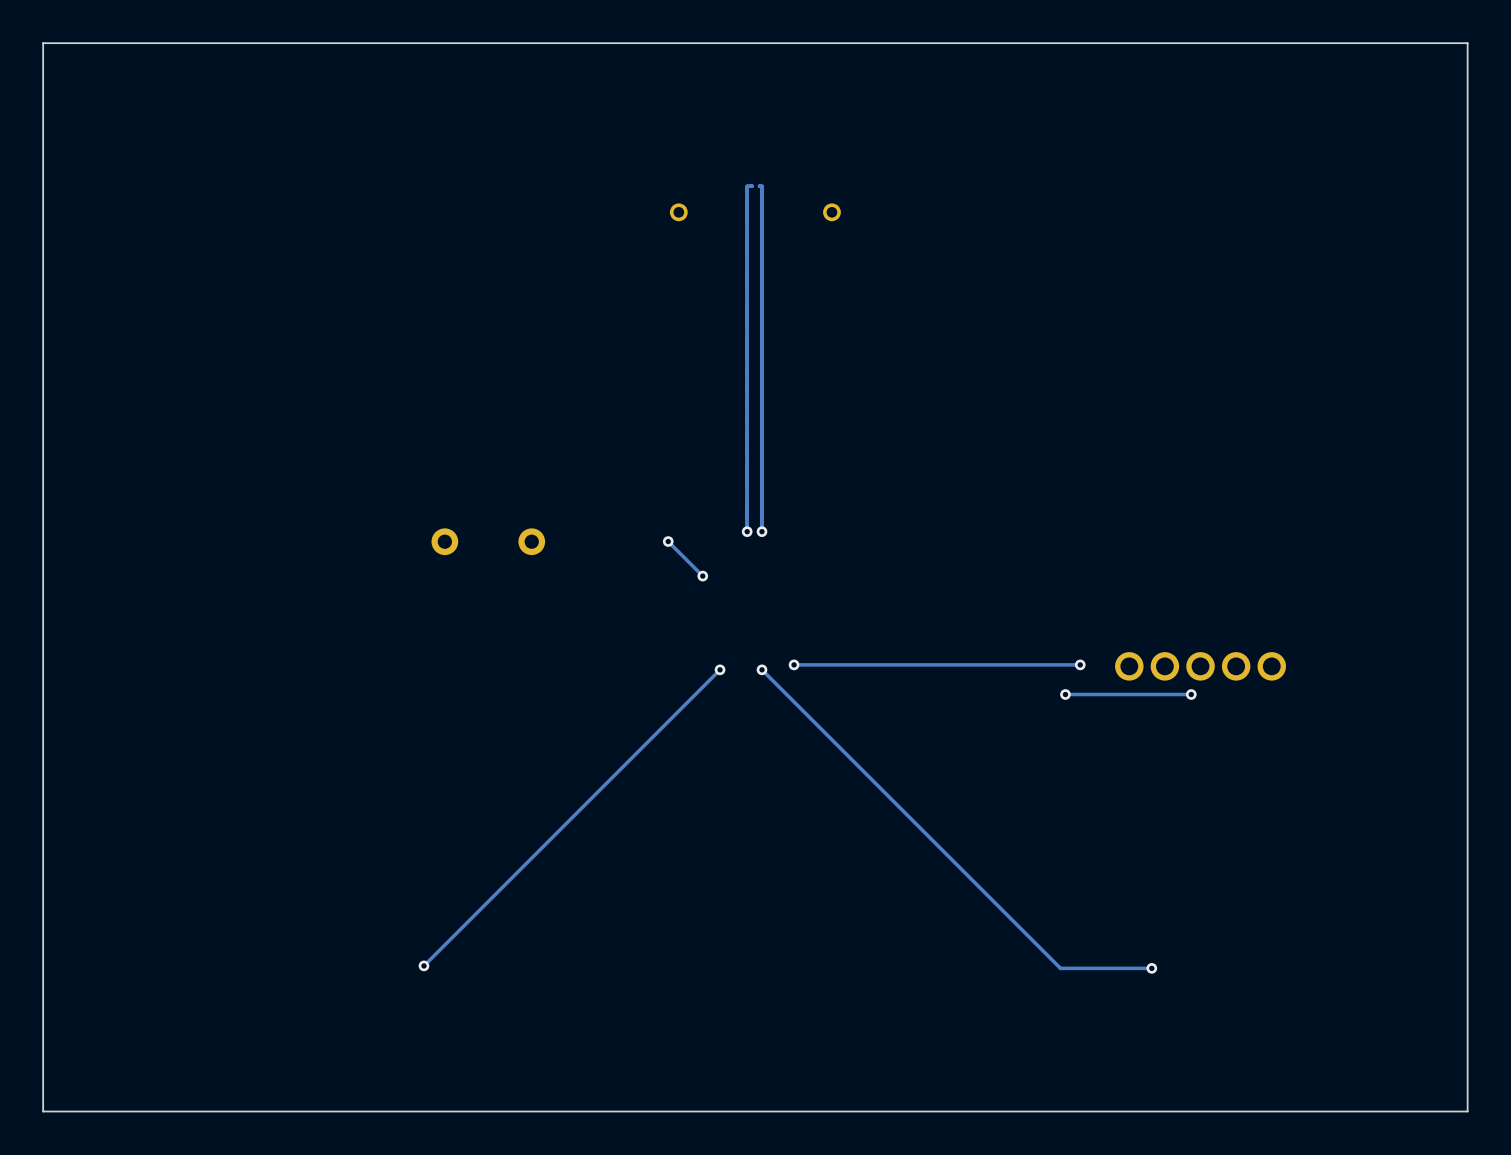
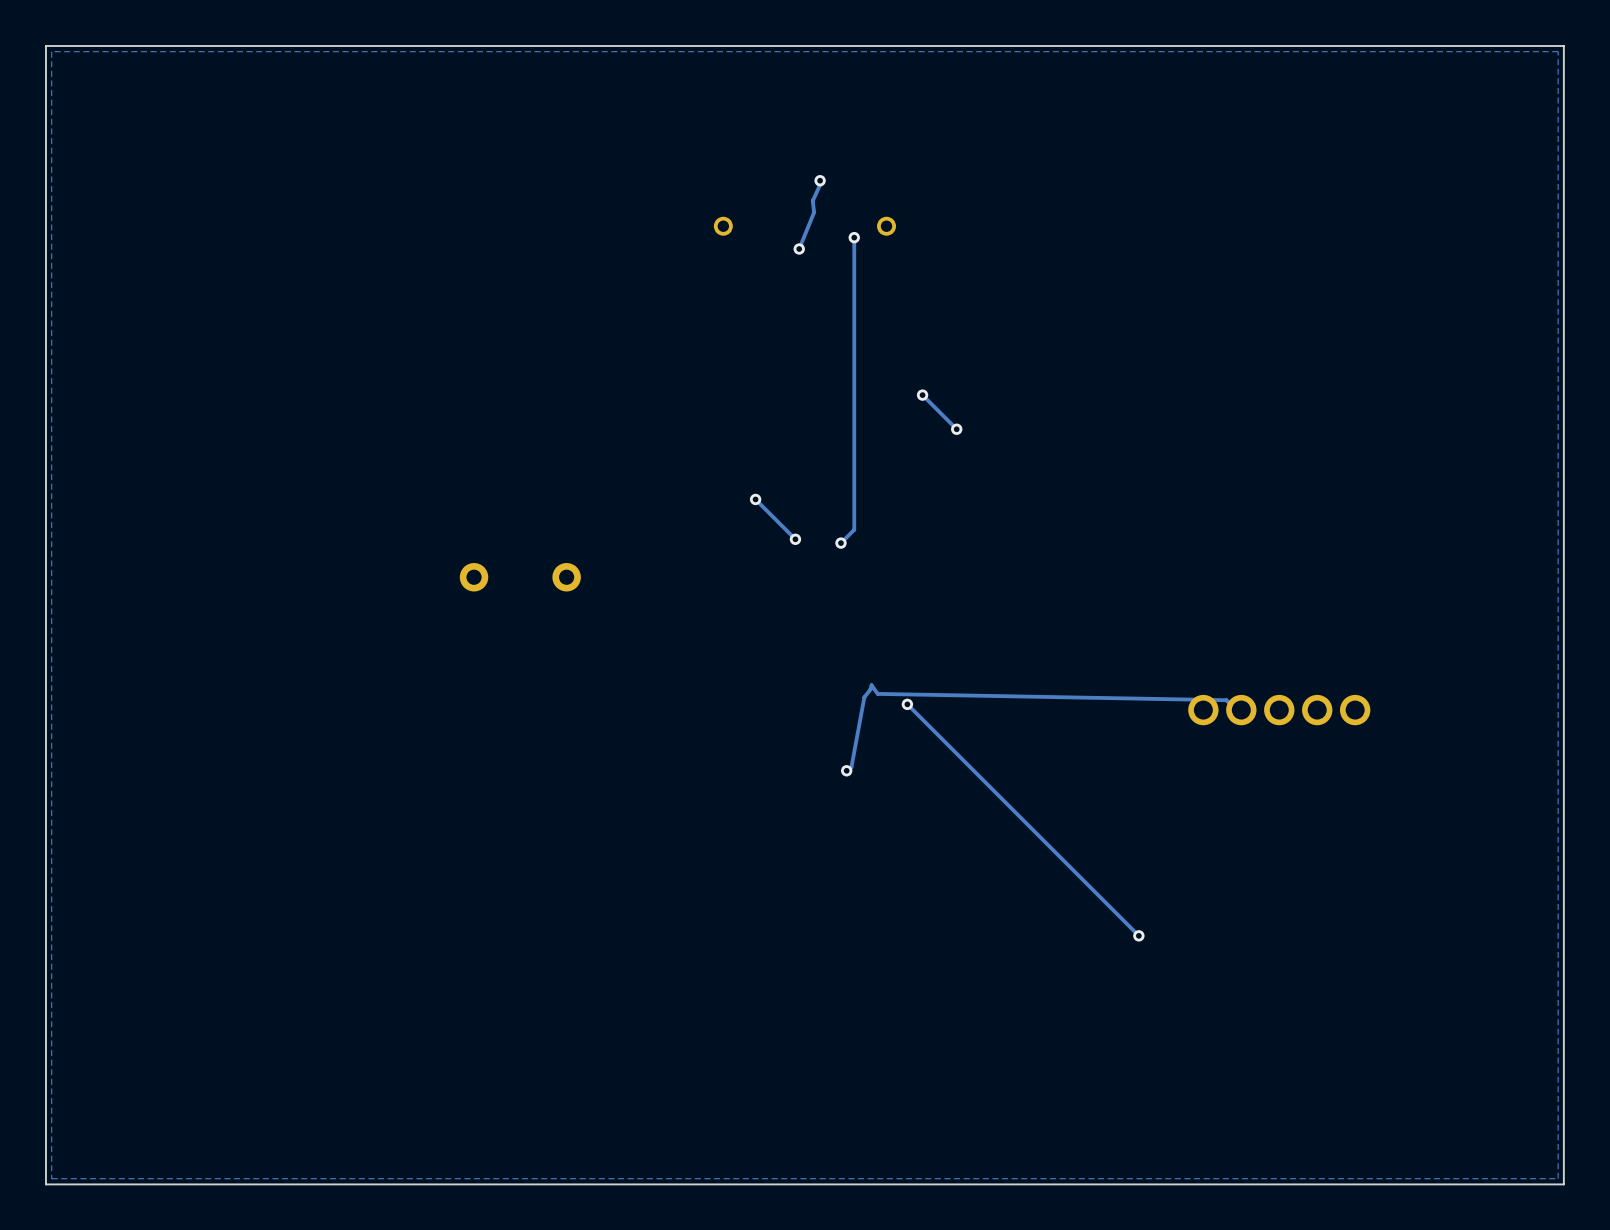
zone outline: none -> (1558, 51) (51, 51) (51, 1178) (1558, 1178) (1558, 51)
track: none -> (820, 180) (812, 200) (814, 212) (799, 249)
via: none -> (820, 180)
track: (750, 185) (747, 186) (747, 531) -> none
track: (759, 185) (761, 186) (761, 531) -> none
track: none -> (854, 237) (854, 529) (840, 543)
via: none -> (854, 237)
via: none -> (799, 249)
track: none -> (922, 395) (956, 429)
via: none -> (922, 395)
via: none -> (956, 429)
track: none -> (755, 499) (795, 539)
via: none -> (755, 499)
via: none -> (795, 539)
via: none -> (840, 543)
via: (747, 531) -> none
via: (761, 531) -> none
track: (668, 541) (702, 576) -> none
via: (668, 541) -> none
via: (702, 576) -> none
track: none -> (907, 704) (1138, 935)
via: none -> (907, 704)
via: (794, 664) -> none
track: (1080, 664) (794, 664) -> none
via: (1080, 664) -> none
track: none -> (1241, 710) (1235, 710) (1226, 700) (877, 693) (871, 685) (864, 697) (851, 767) (846, 770)
track: (720, 669) (423, 965) -> none
via: (720, 669) -> none
track: (761, 669) (1060, 968) (1151, 968) -> none
via: (761, 669) -> none
via: (1065, 694) -> none
track: (1191, 694) (1065, 694) -> none
via: (1191, 694) -> none
via: none -> (846, 770)
via: none -> (1138, 935)
via: (423, 965) -> none
via: (1151, 968) -> none

